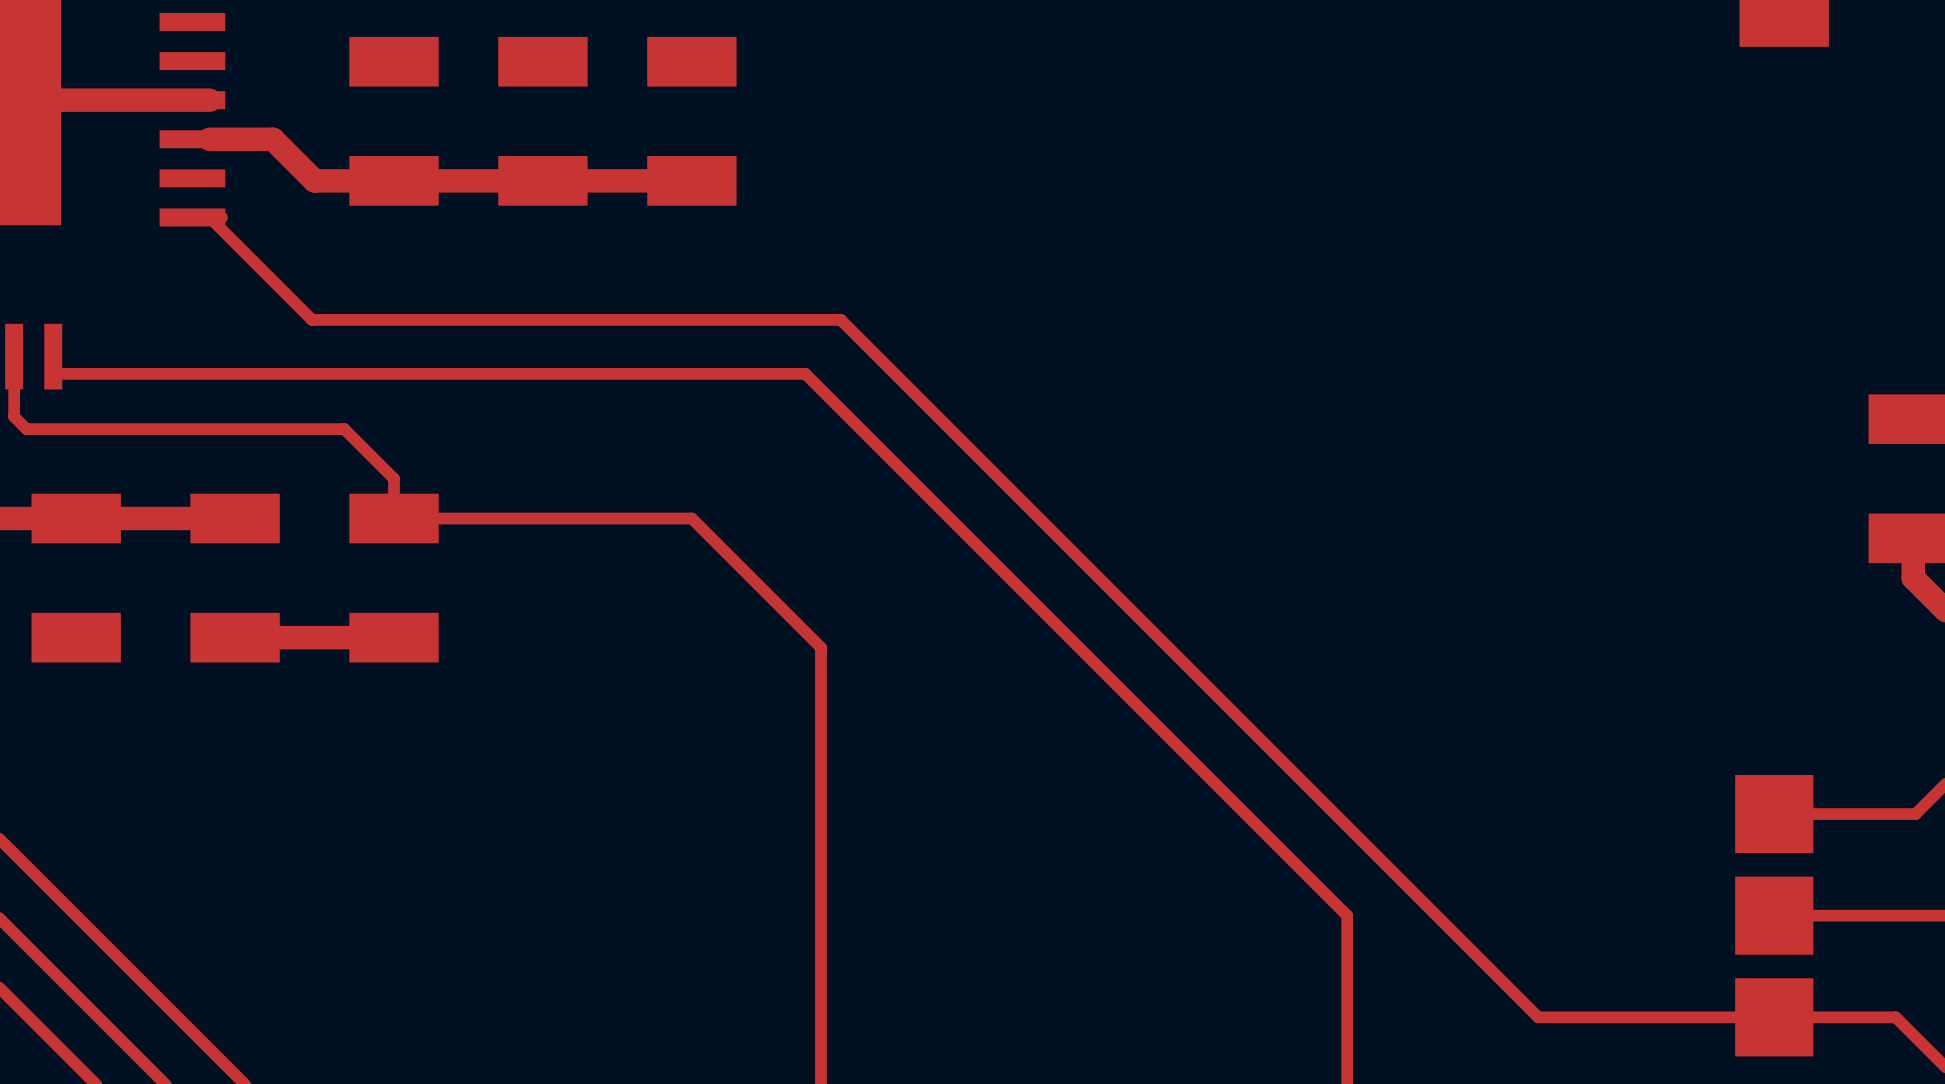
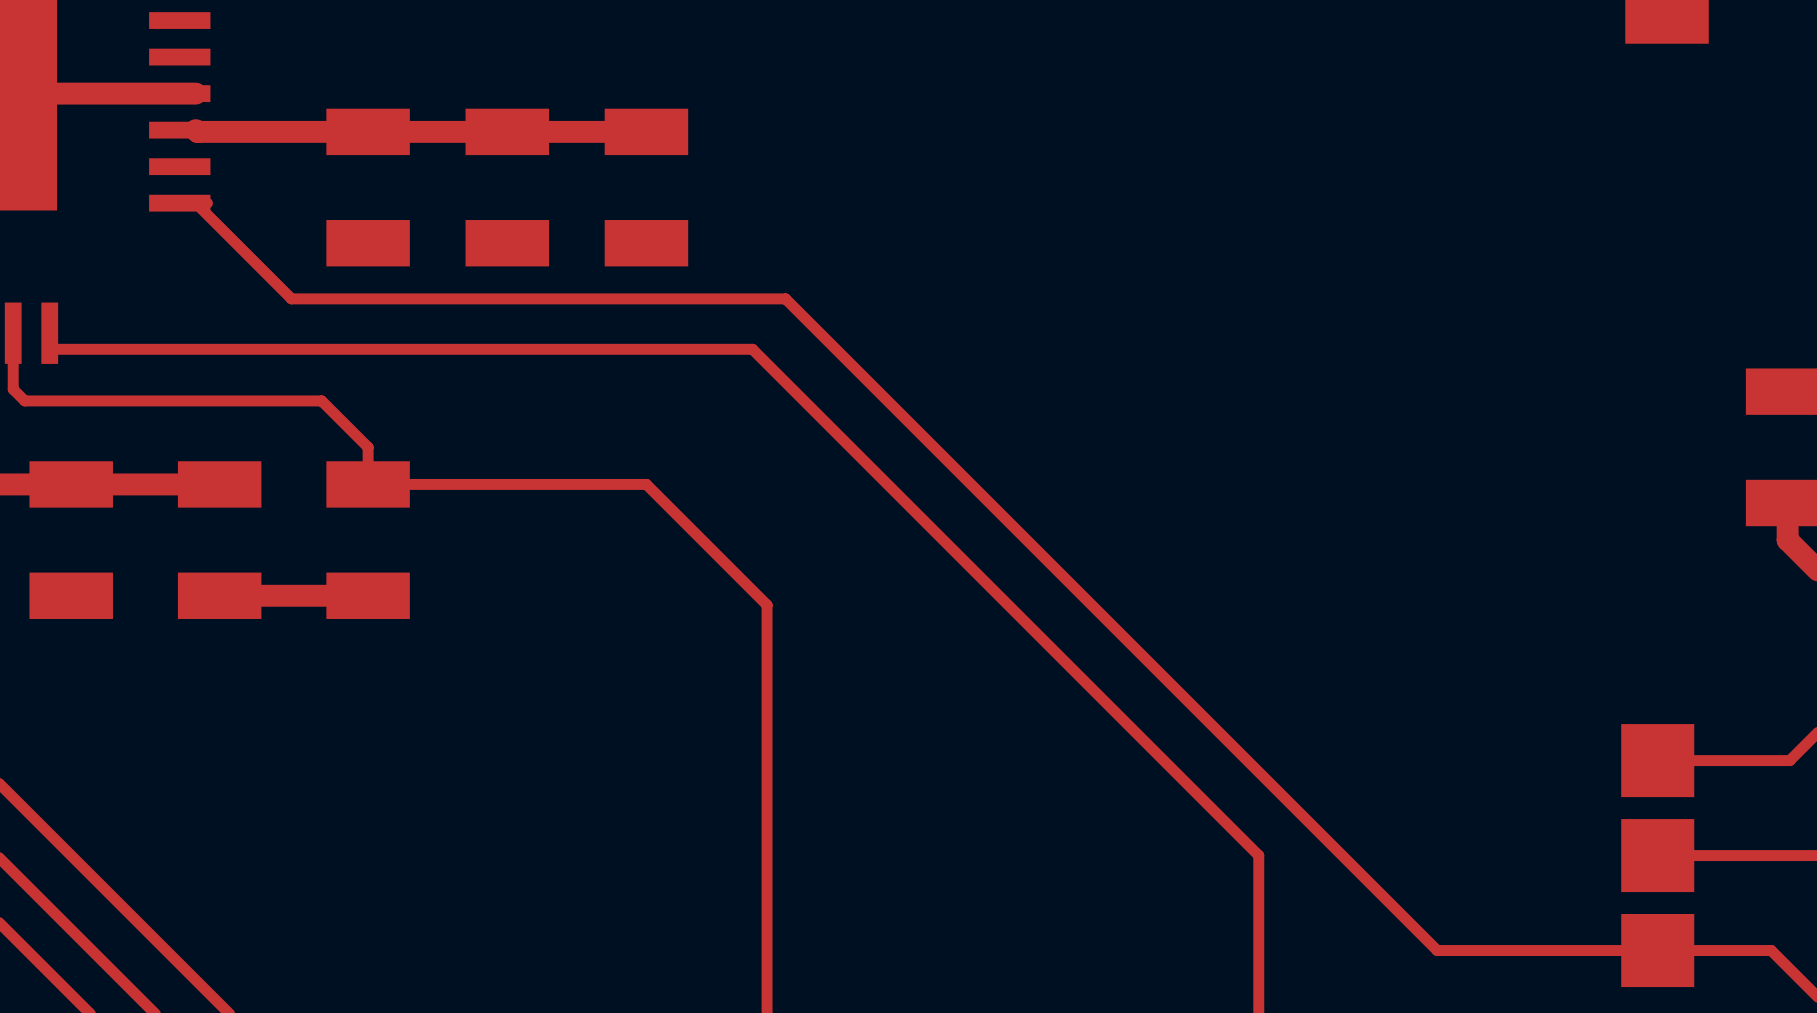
part position: (393, 121) -> (368, 187)
part position: (542, 121) -> (507, 187)
part position: (691, 121) -> (646, 187)
top track: (209, 139) (272, 139) (314, 180) (691, 180) -> (195, 130) (197, 131) (646, 131)

